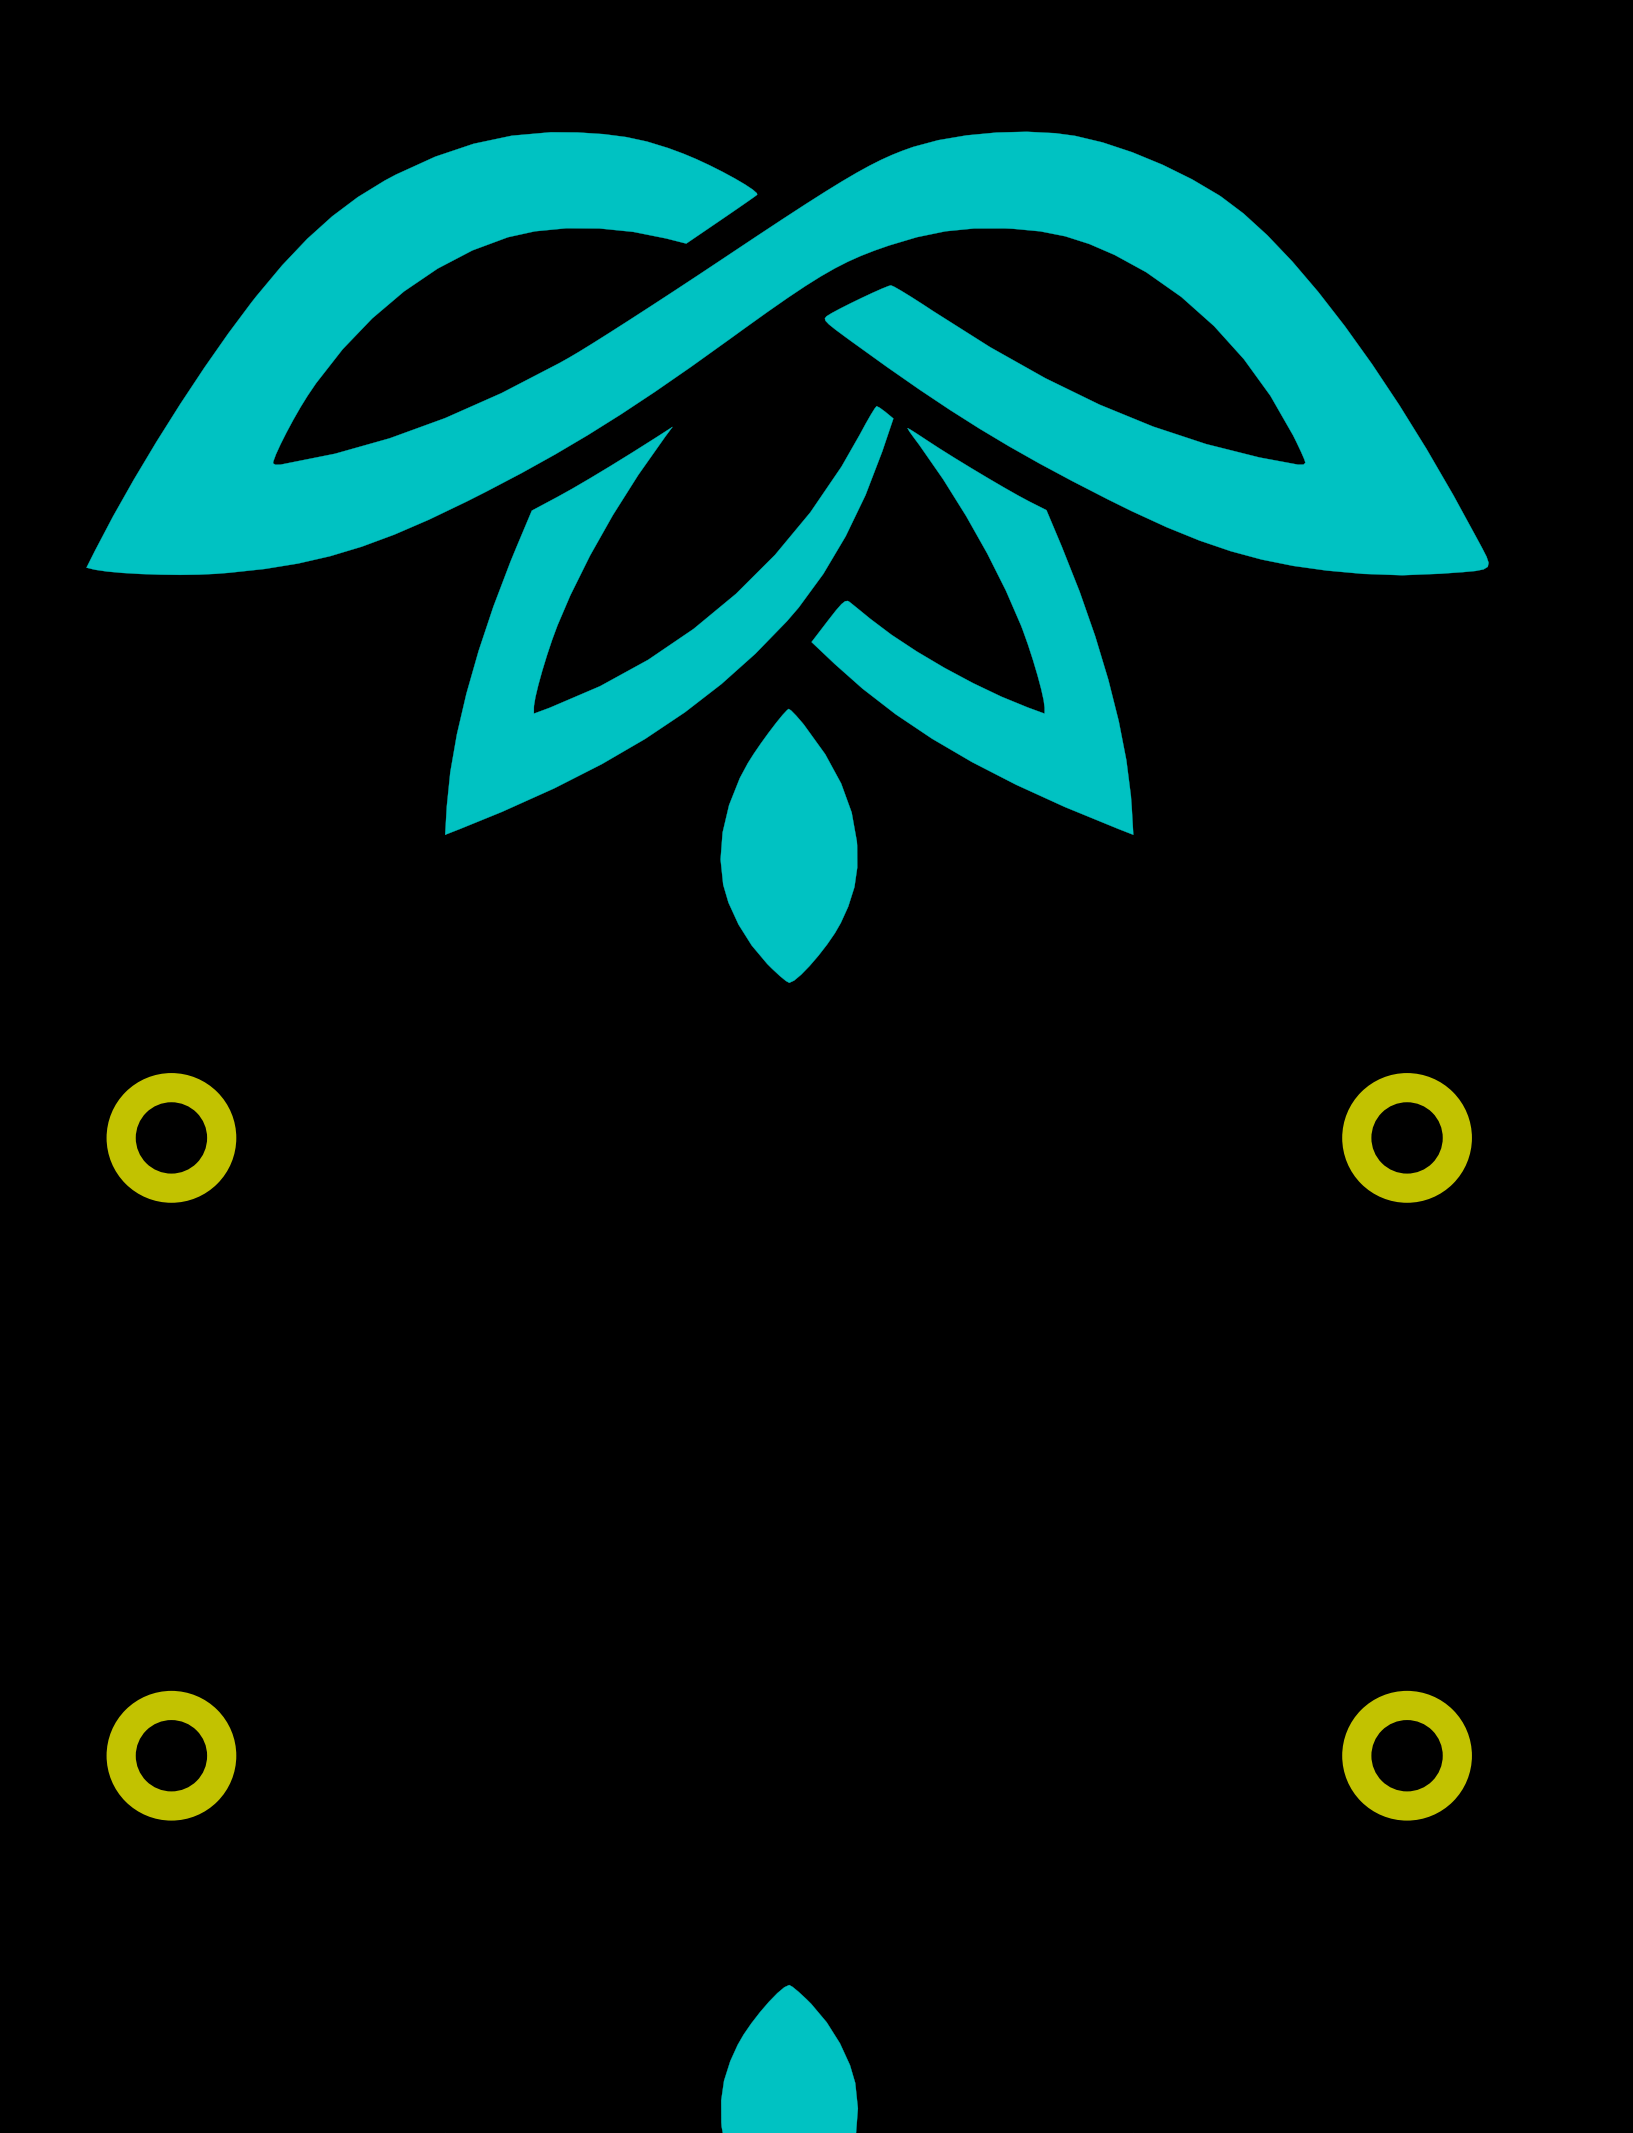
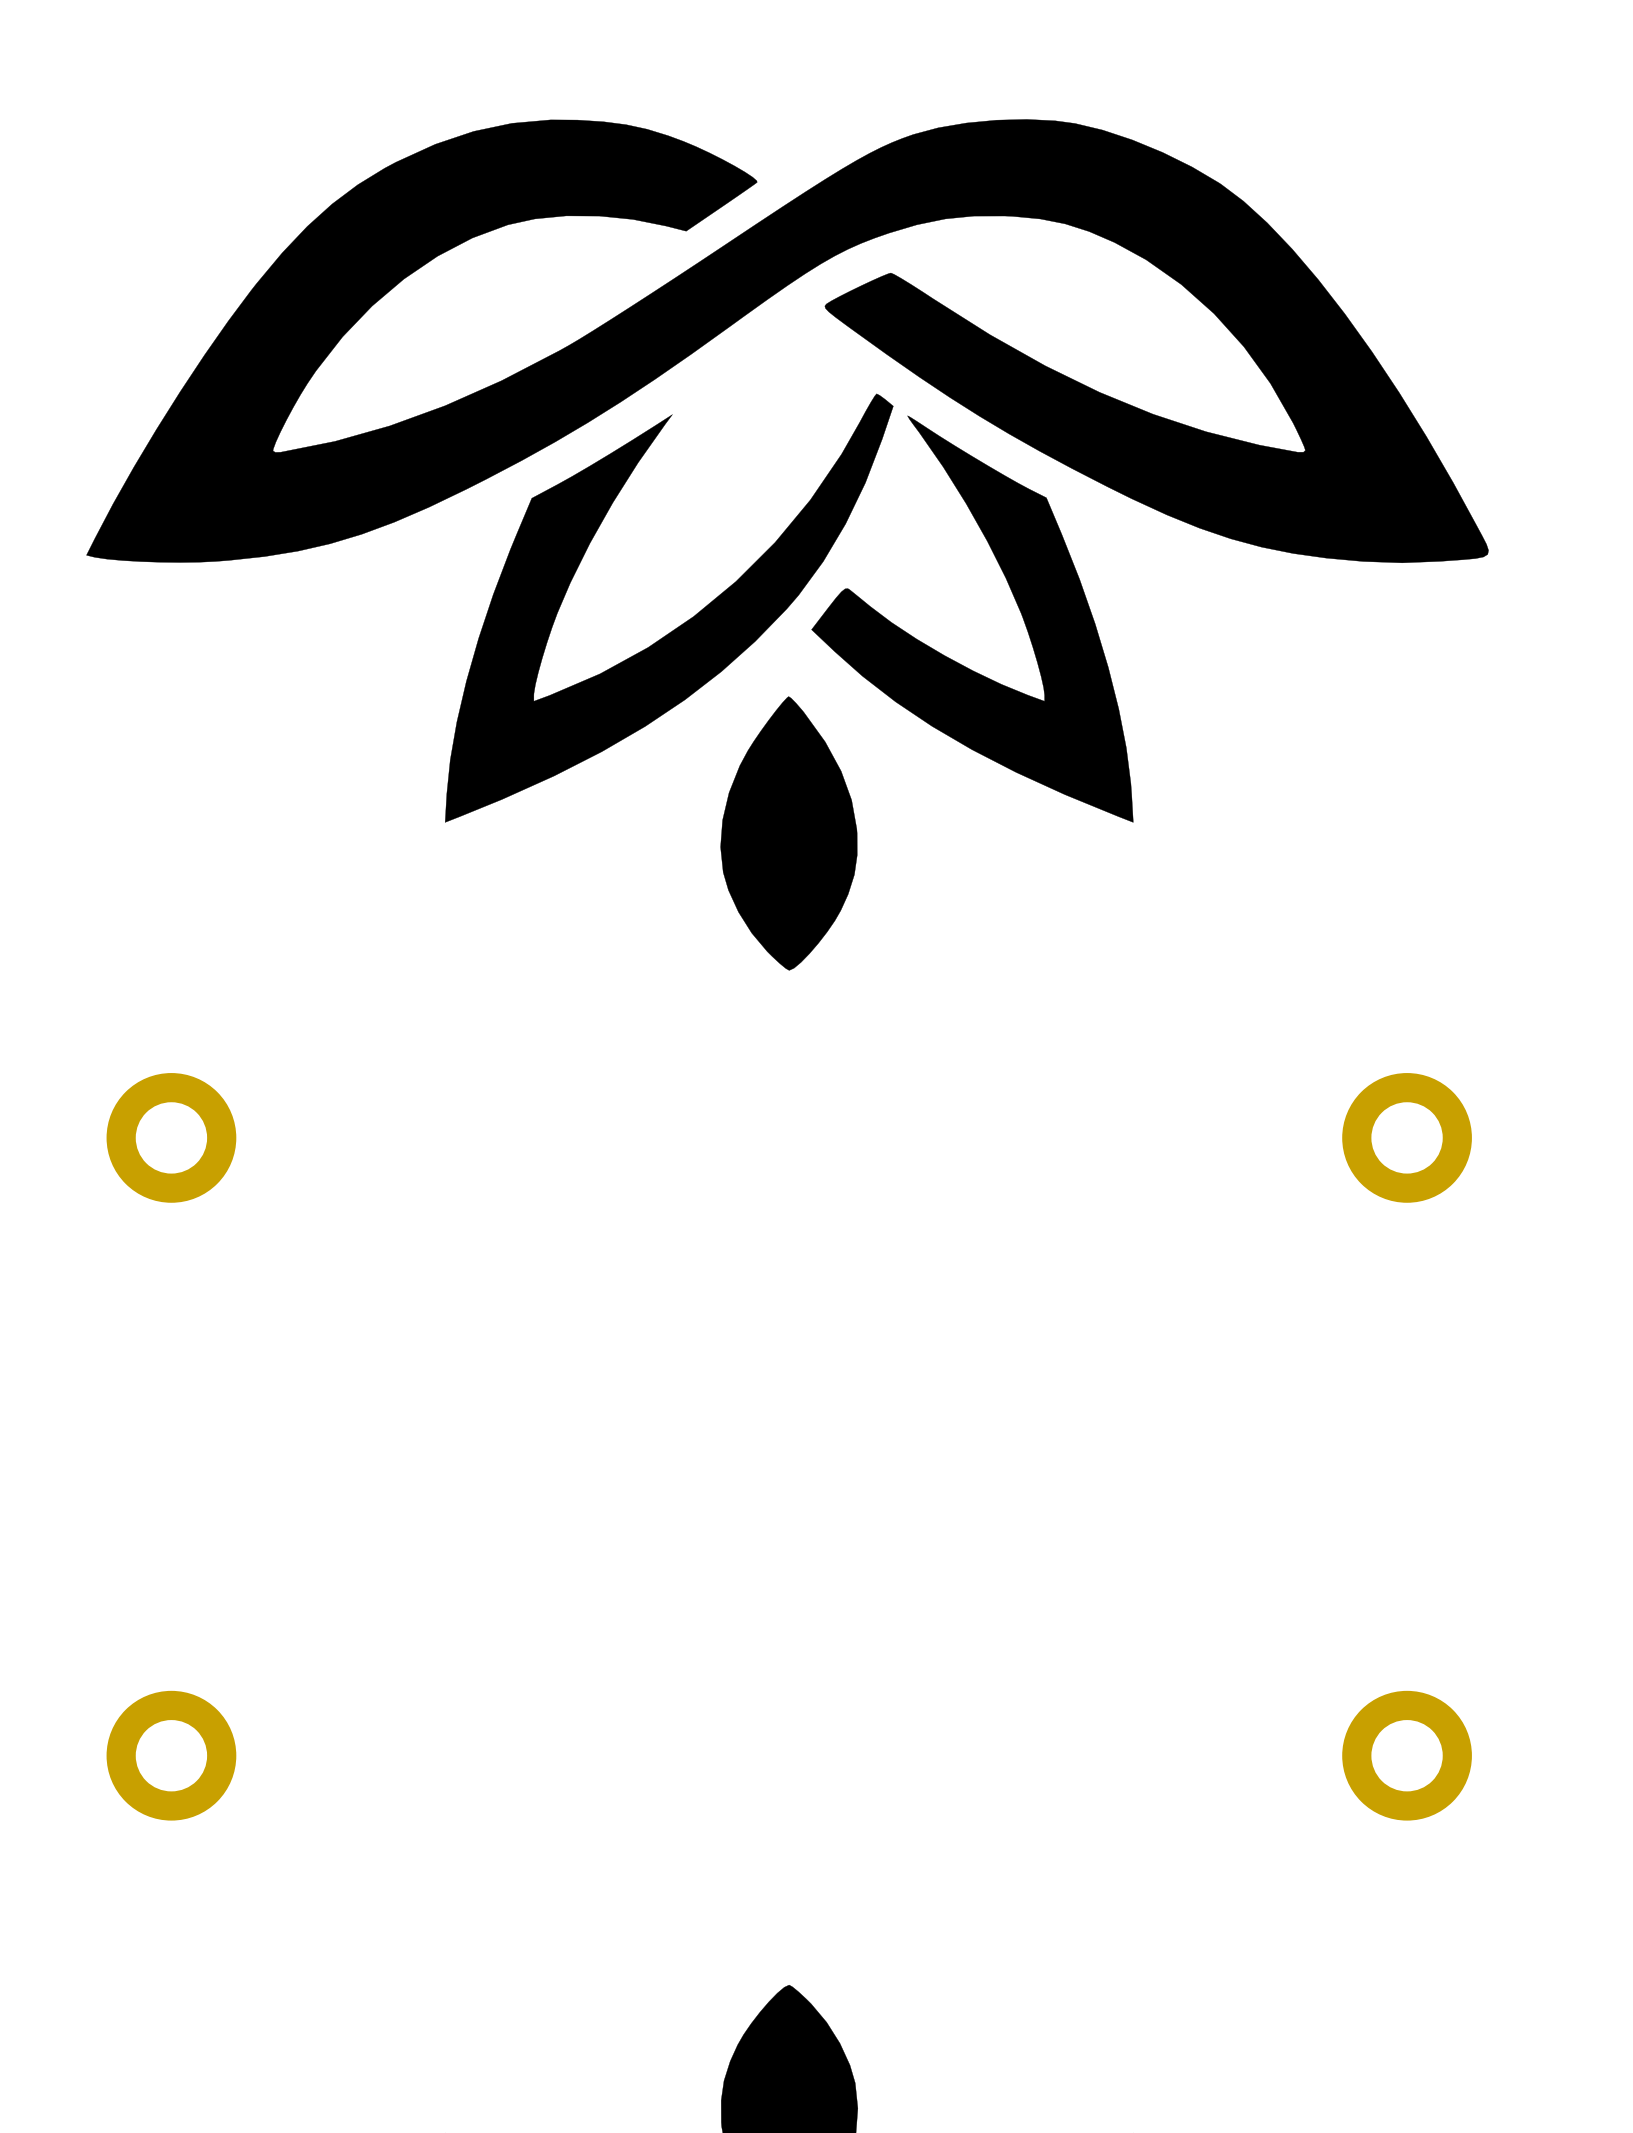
drawing position: (787, 557) -> (787, 544)

